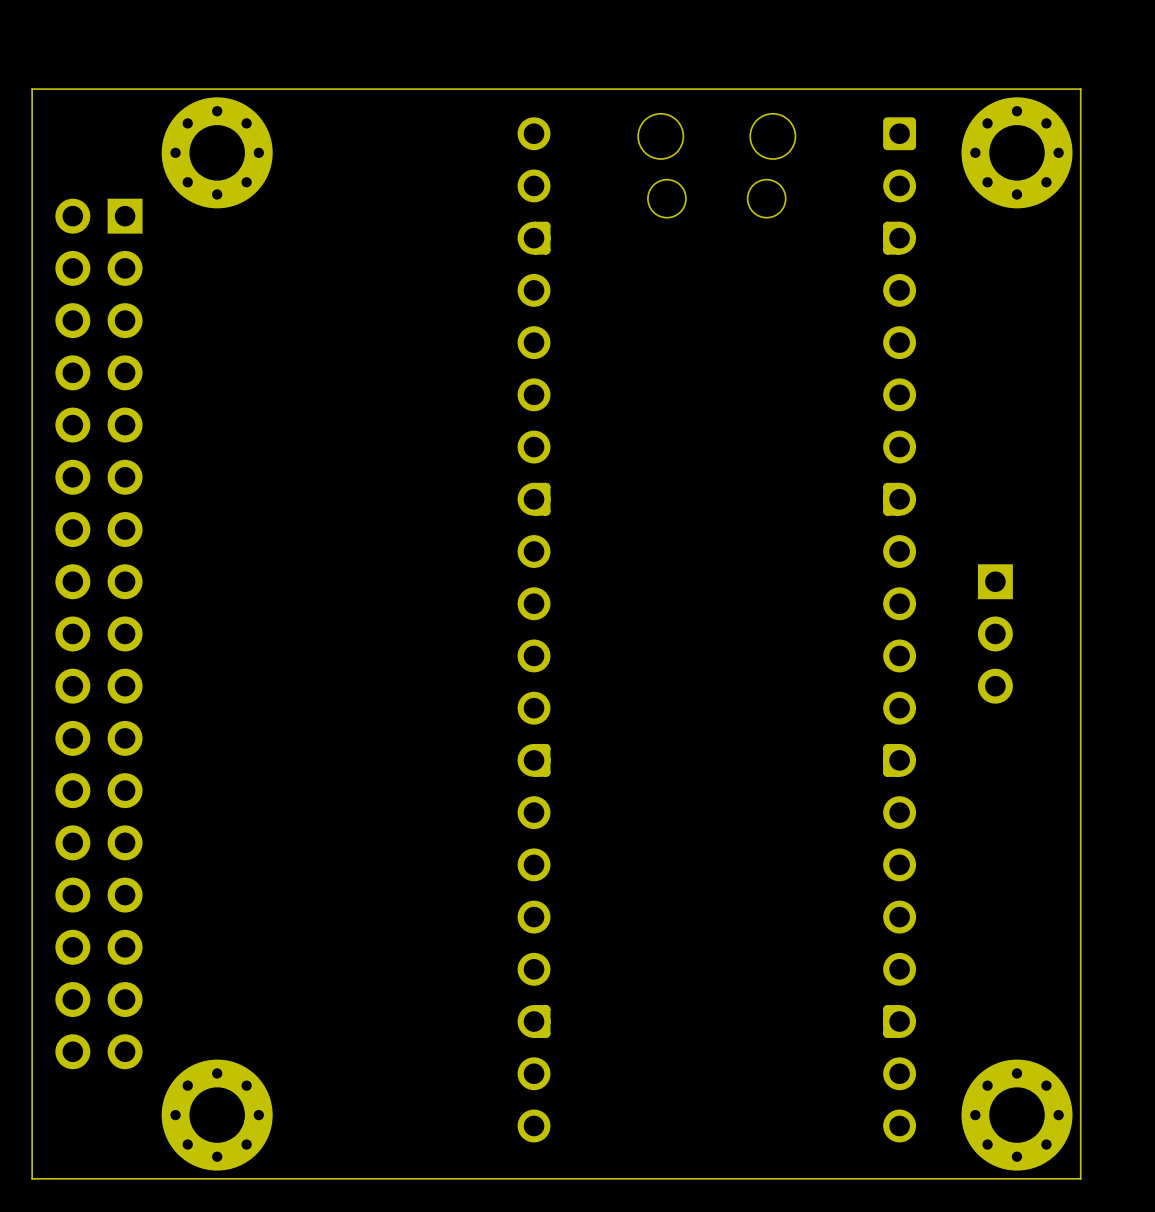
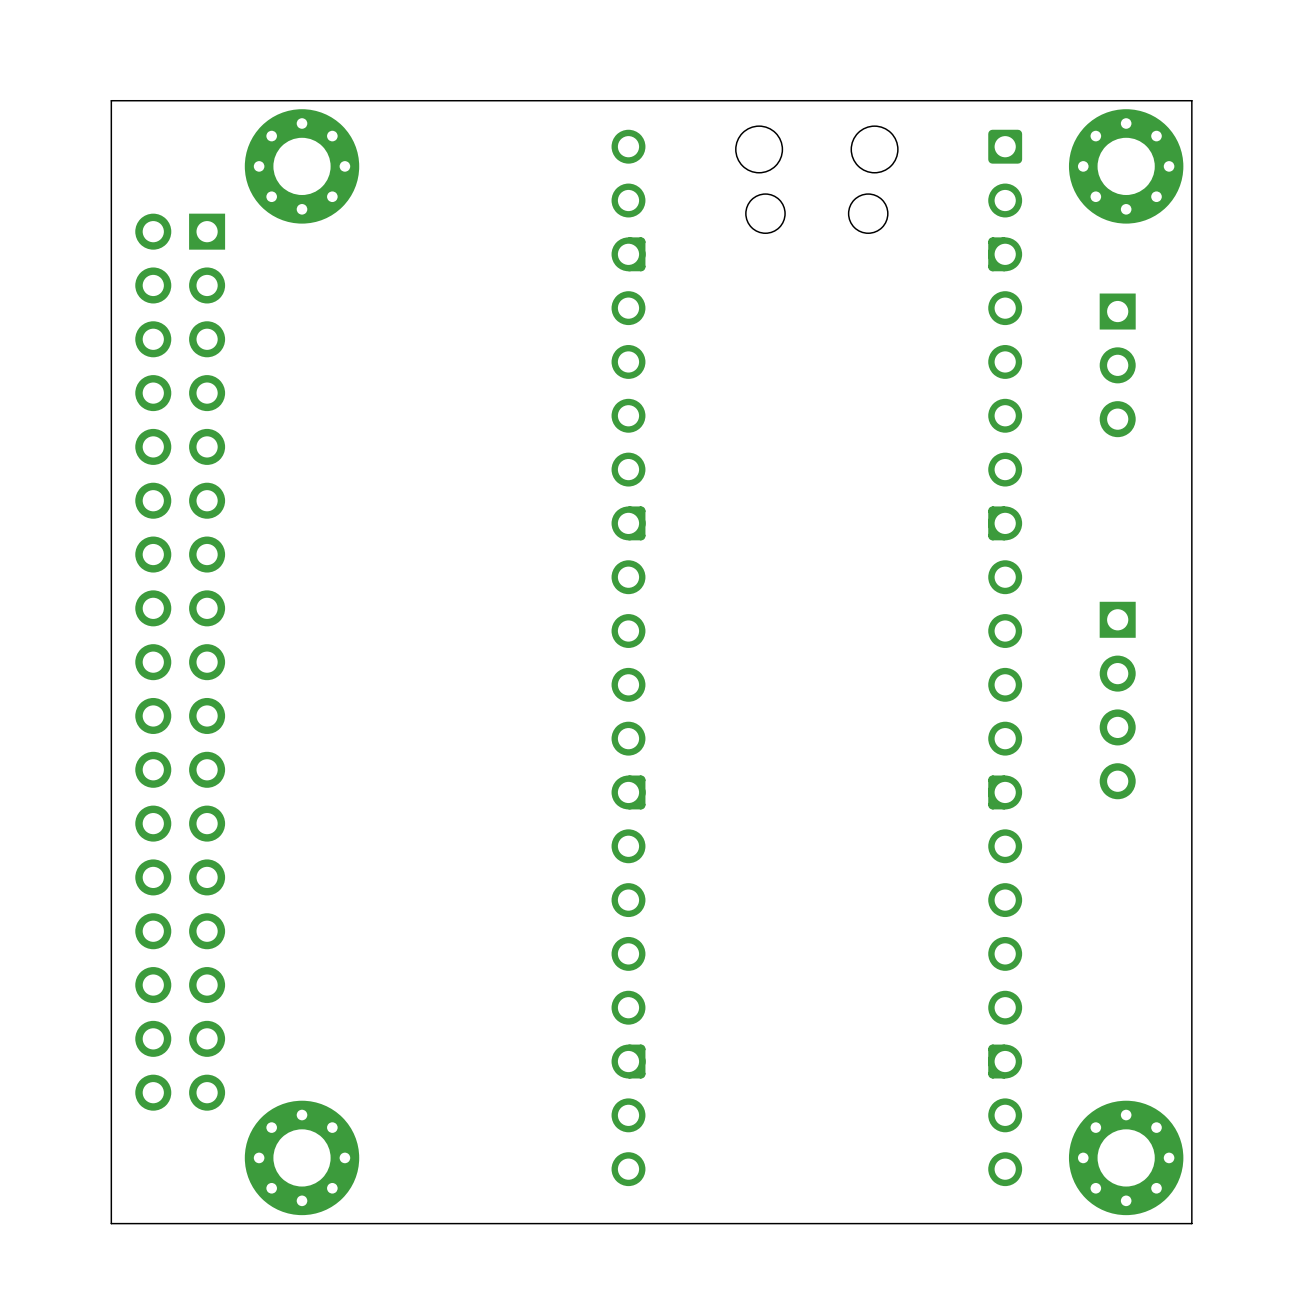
part position: (995, 633) -> (1117, 365)
part: none -> (1117, 700)

